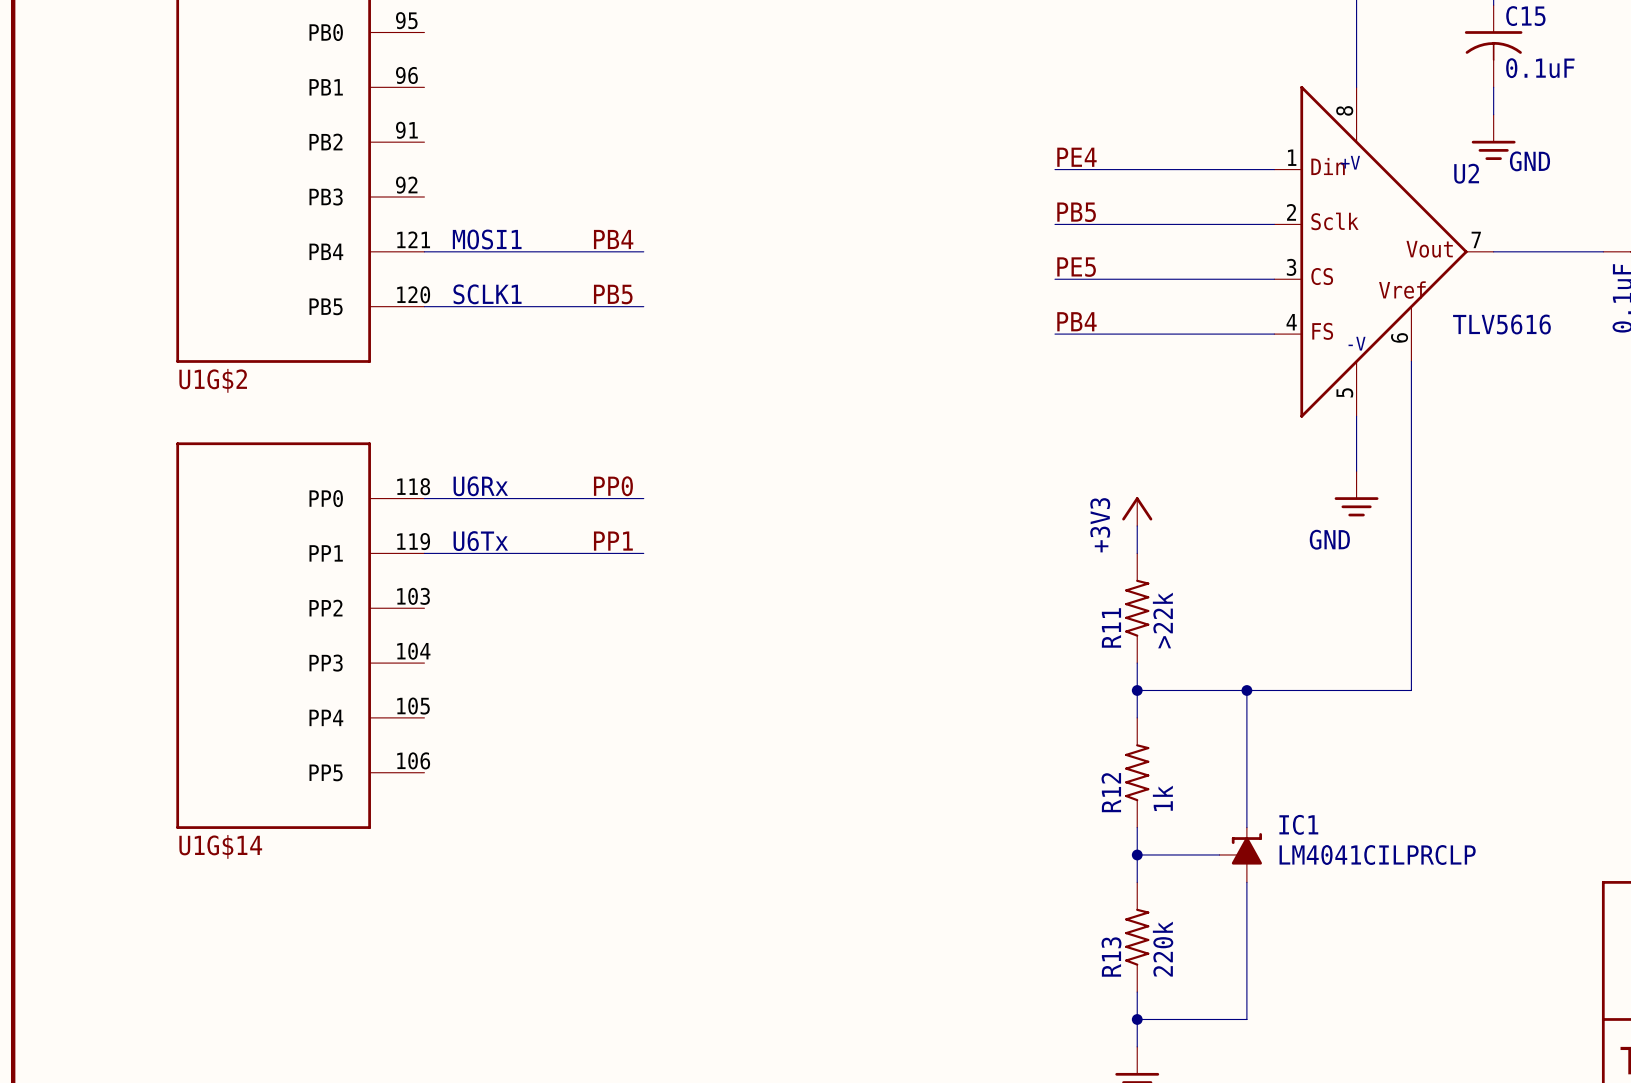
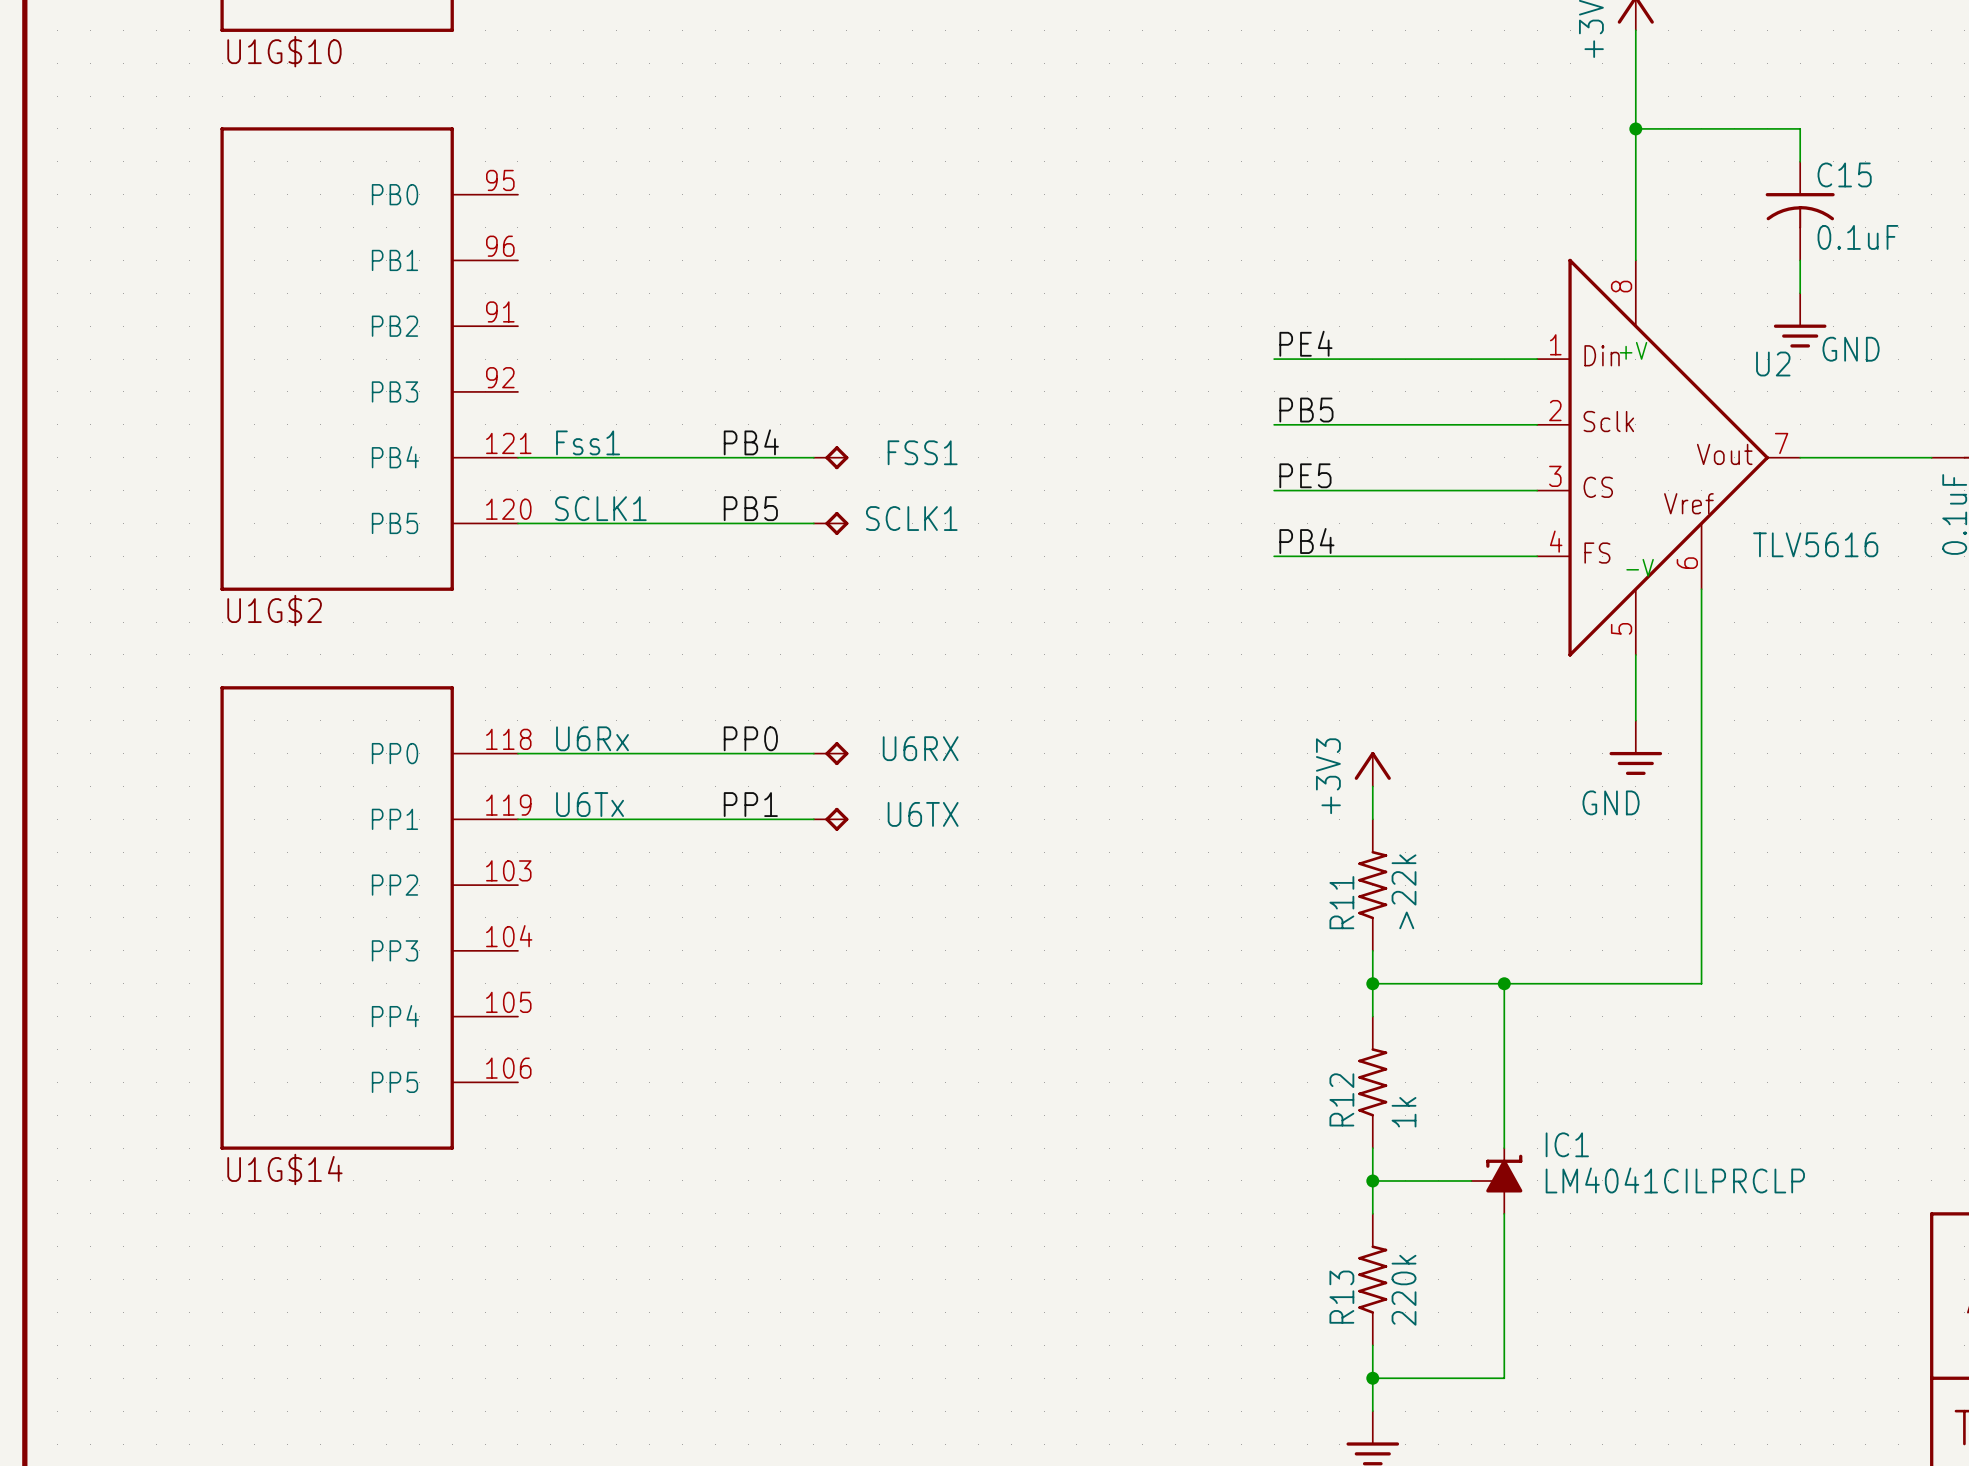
text: MOSI1 (487, 239) -> Fss1 (588, 442)
wire: none -> (780, 457) (813, 457)
FSS1: none -> (831, 457)
wire: none -> (780, 523) (813, 523)
SCLK1: none -> (831, 523)
wire: none -> (780, 753) (813, 753)
U6RX: none -> (831, 753)
wire: none -> (780, 819) (813, 819)
U6TX: none -> (831, 819)

